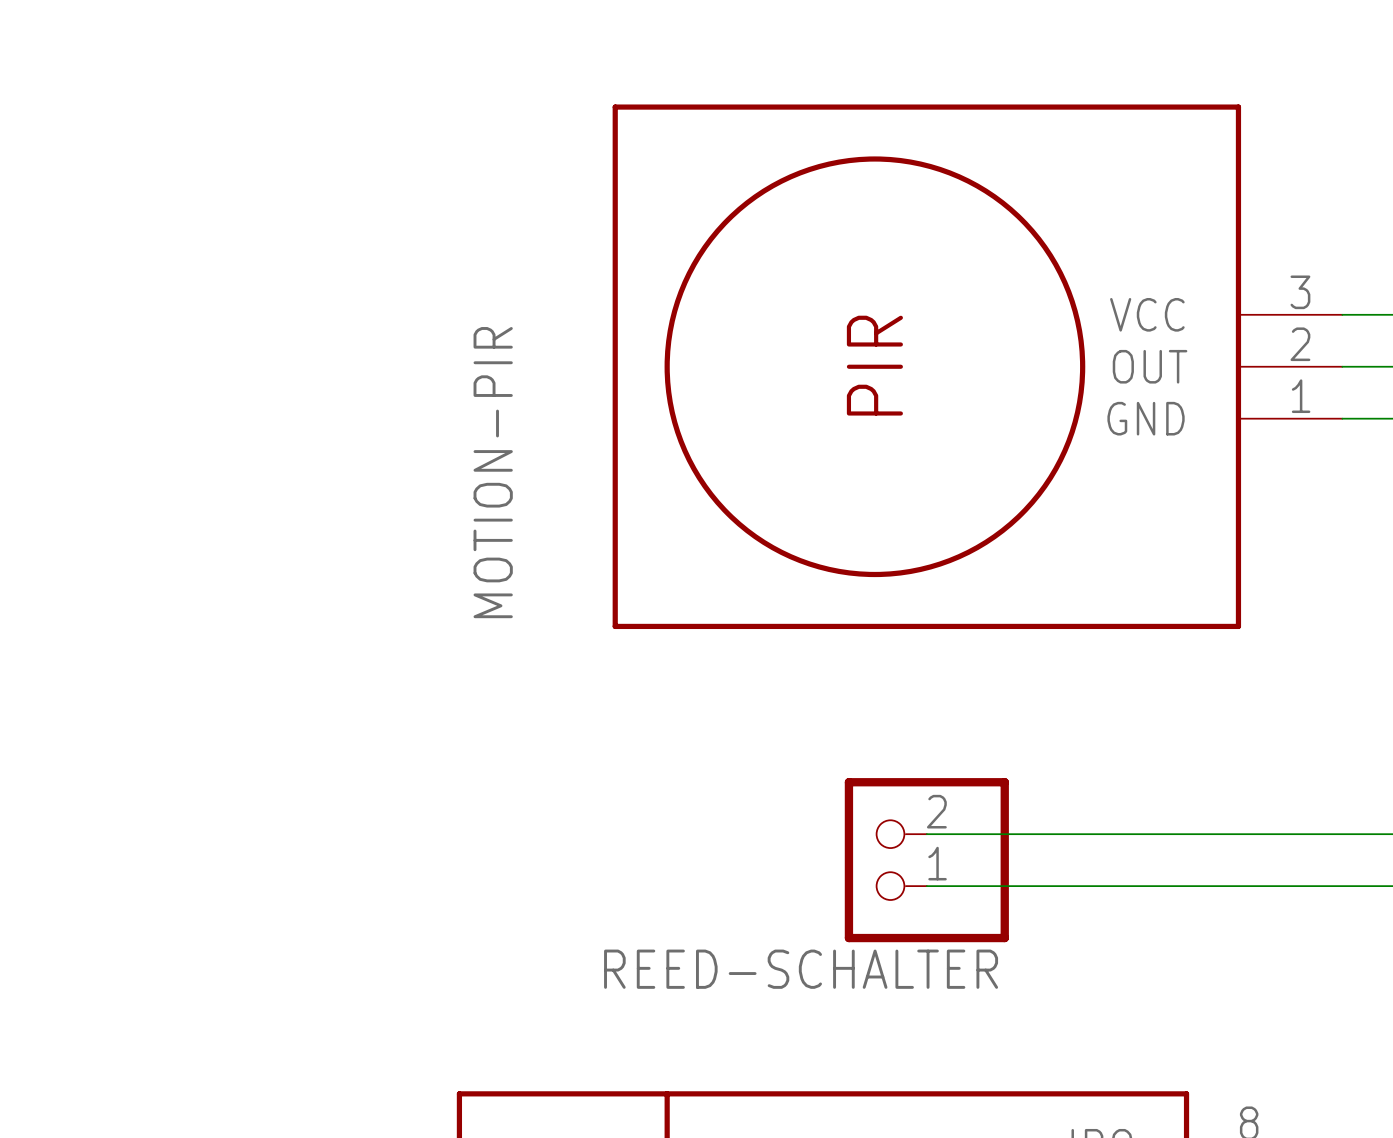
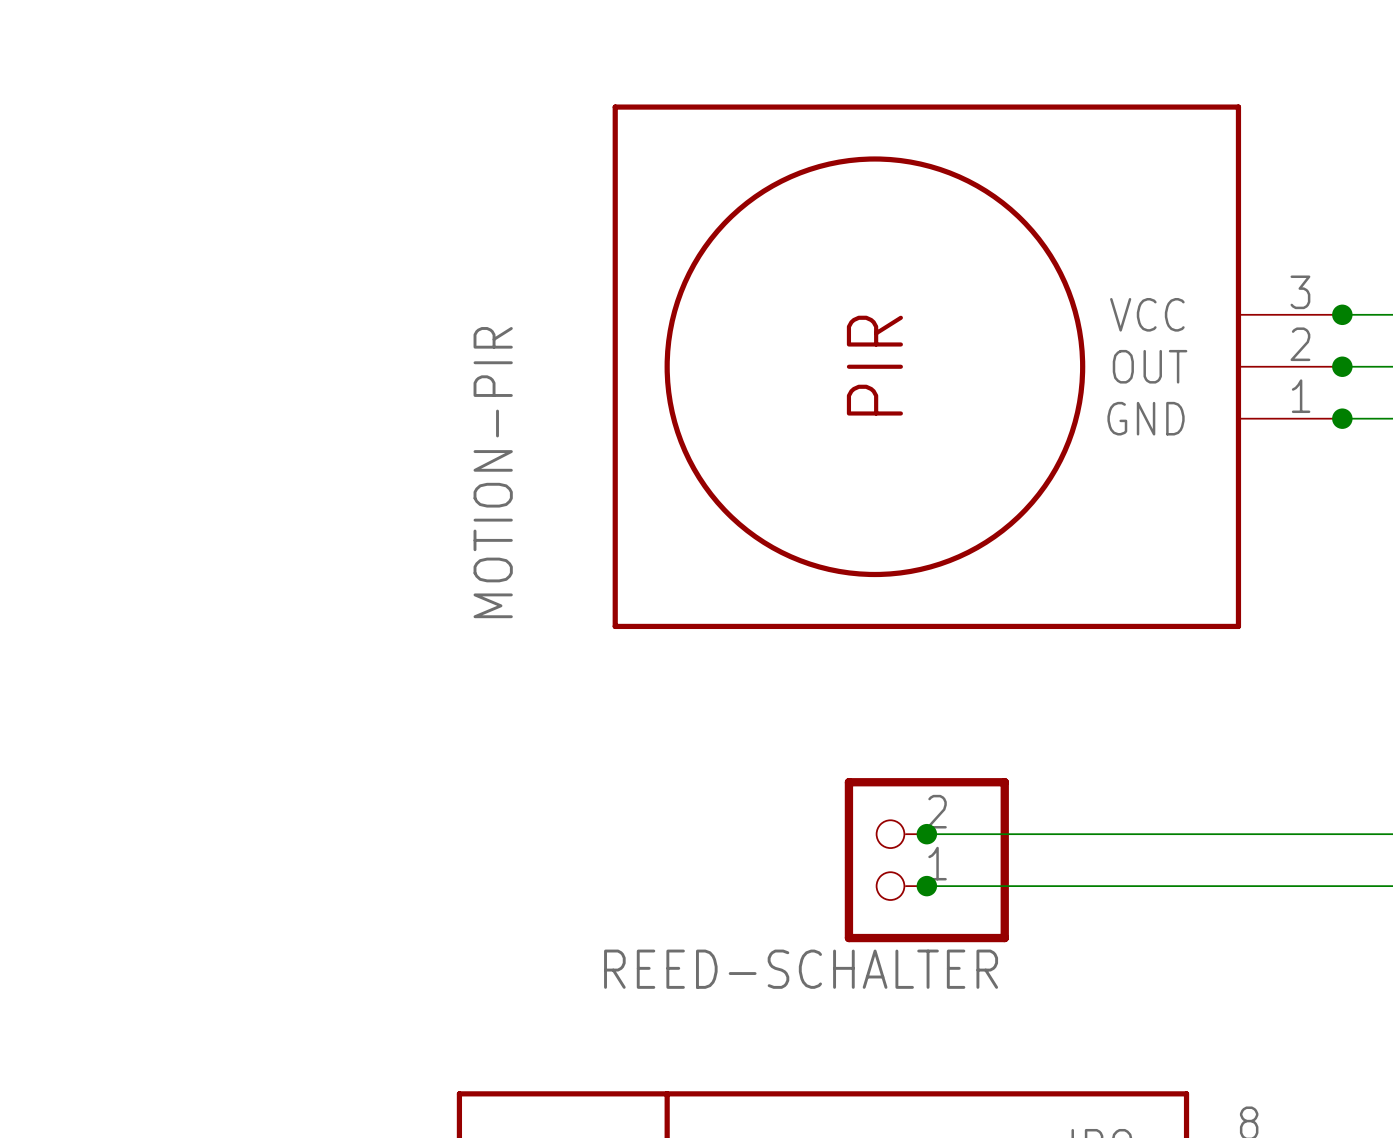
junction: none -> (1342, 314)
junction: none -> (1342, 366)
junction: none -> (1342, 418)
junction: none -> (926, 834)
junction: none -> (926, 886)

